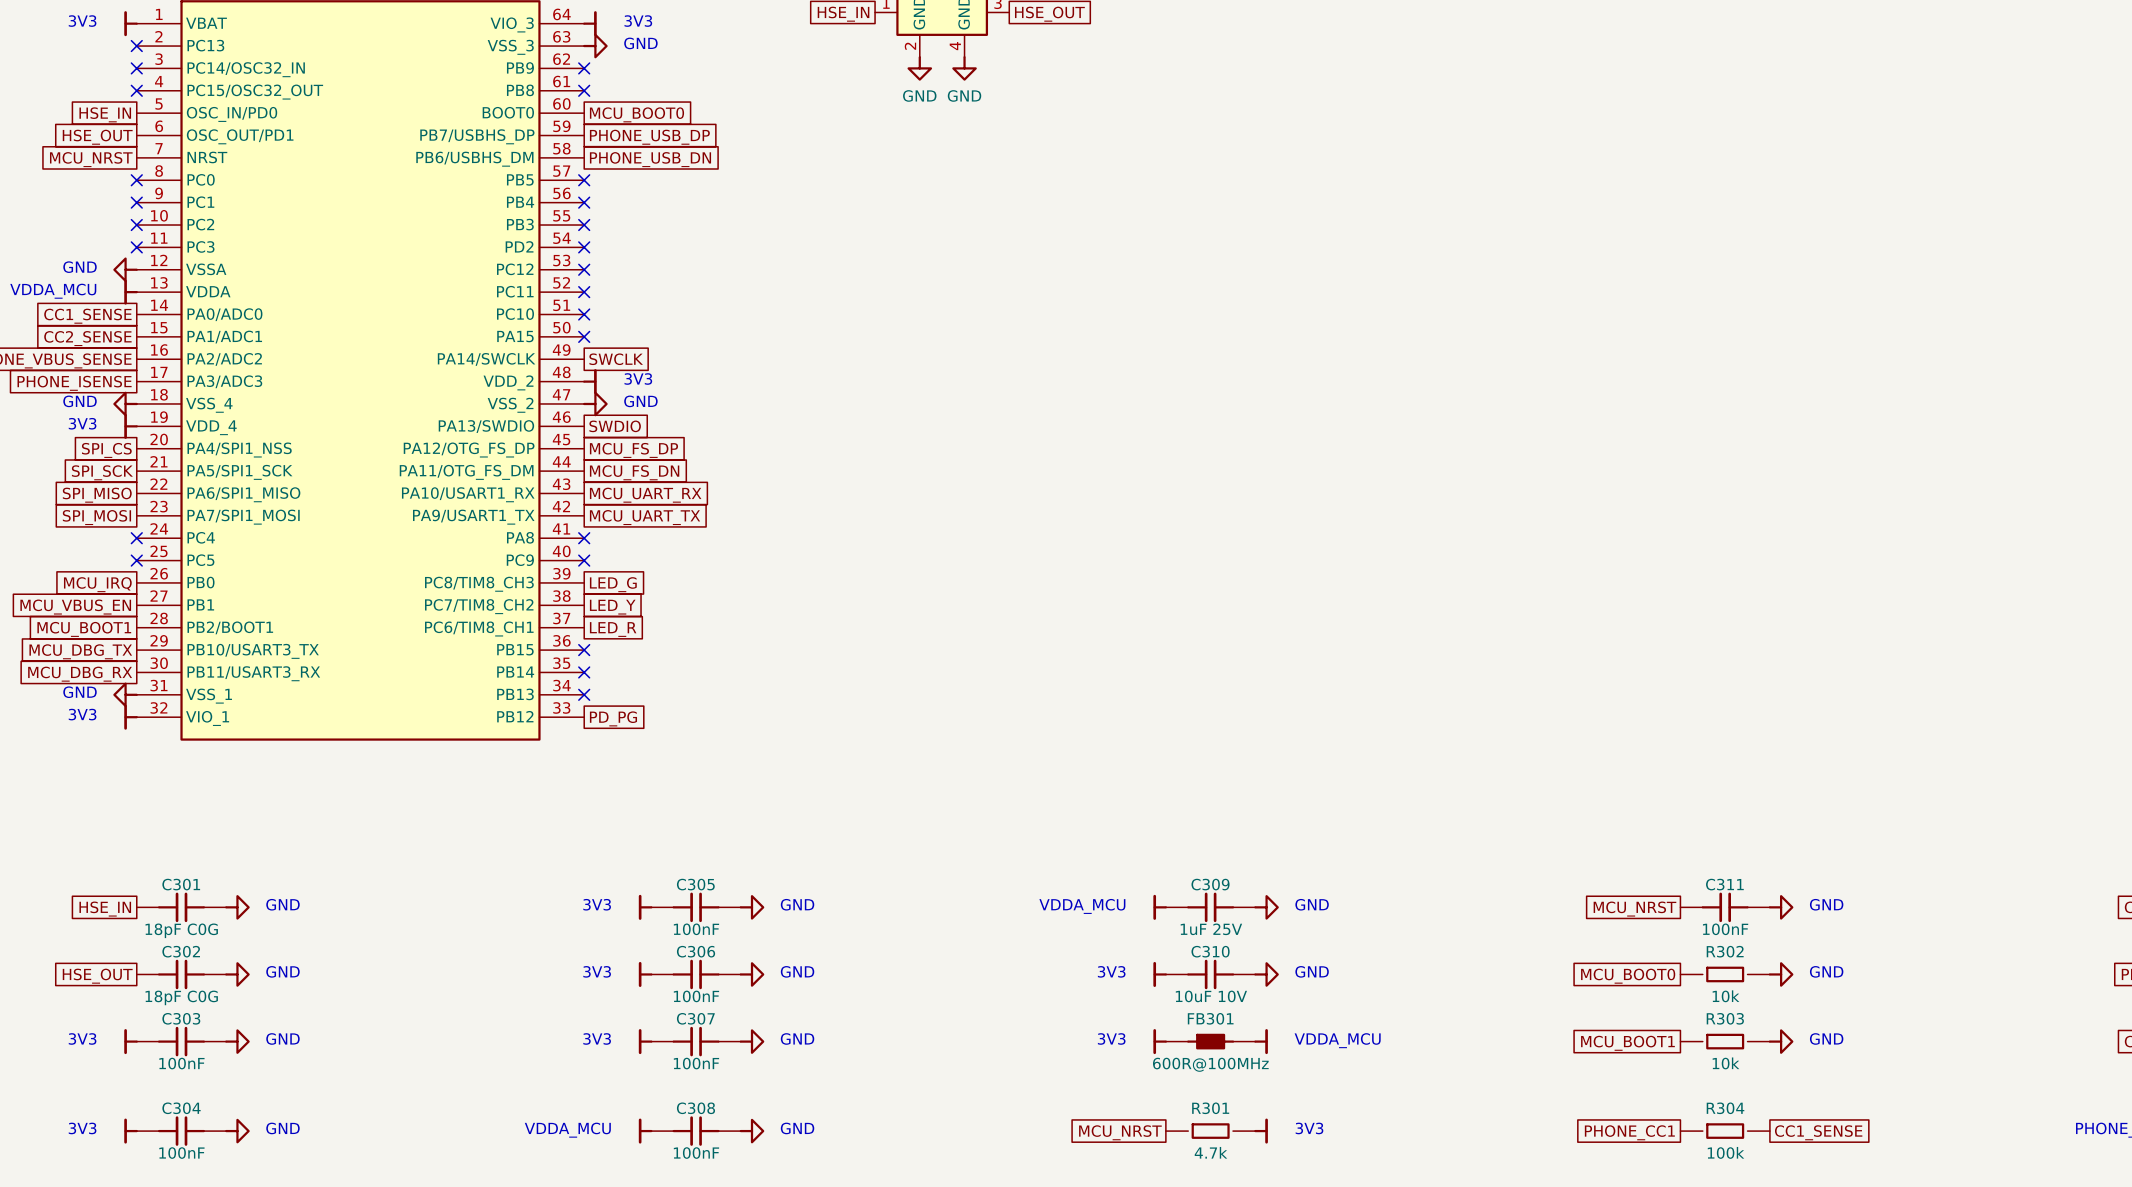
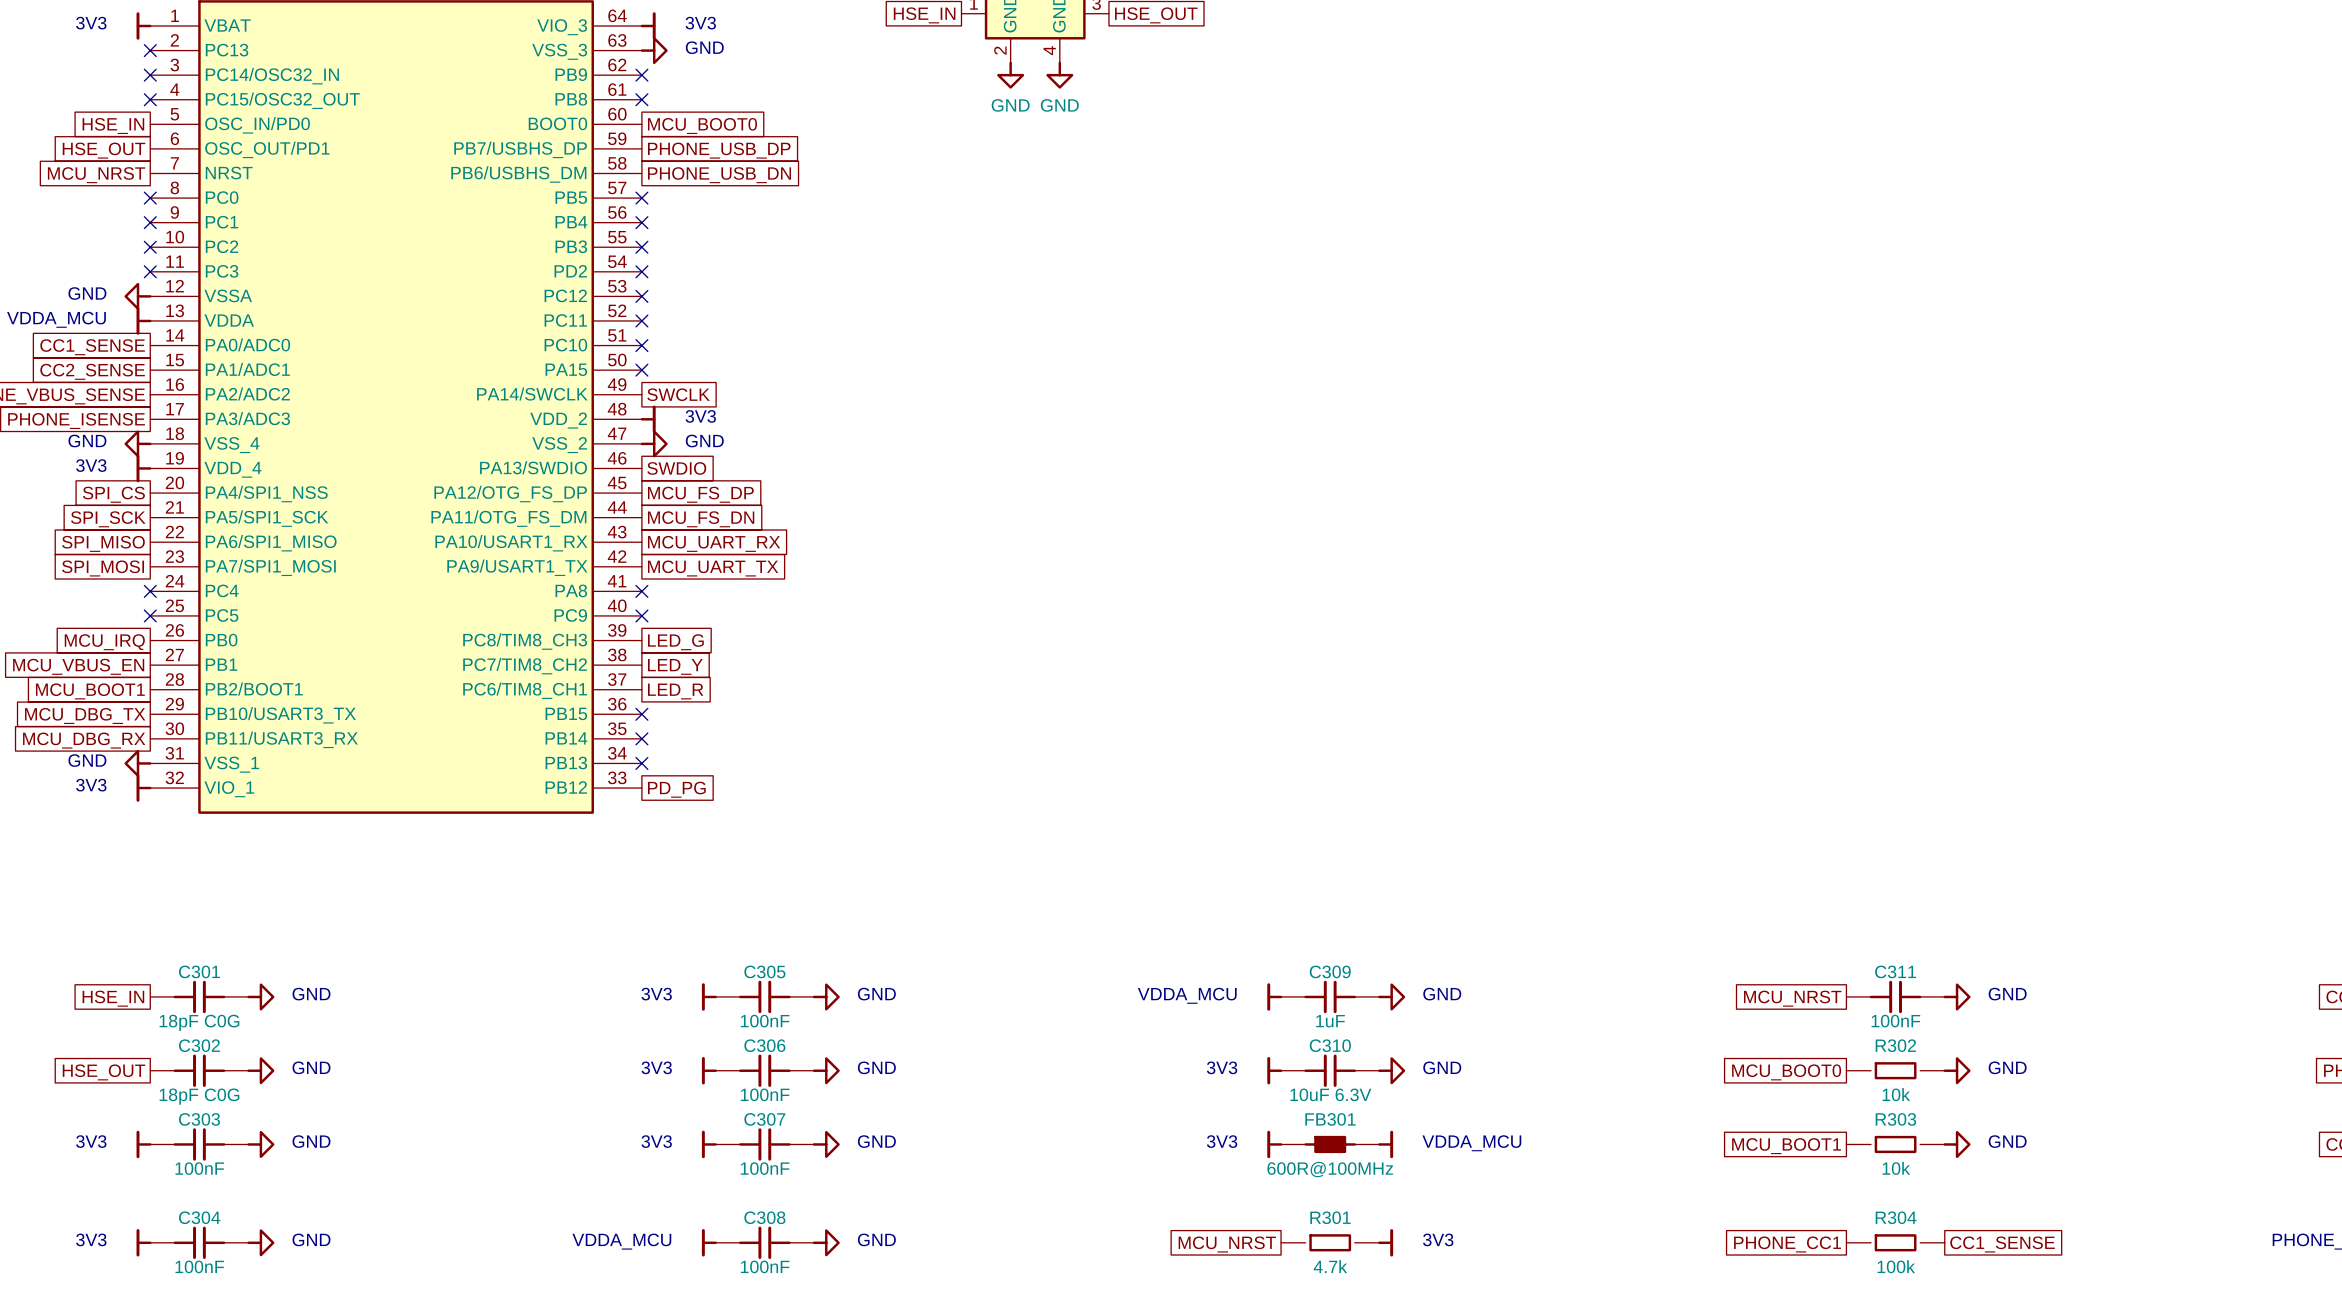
C309 value: 1uF 25V (1211, 929) -> 1uF (1330, 1021)
C310 value: 10uF 10V (1211, 996) -> 10uF 6.3V (1330, 1094)

